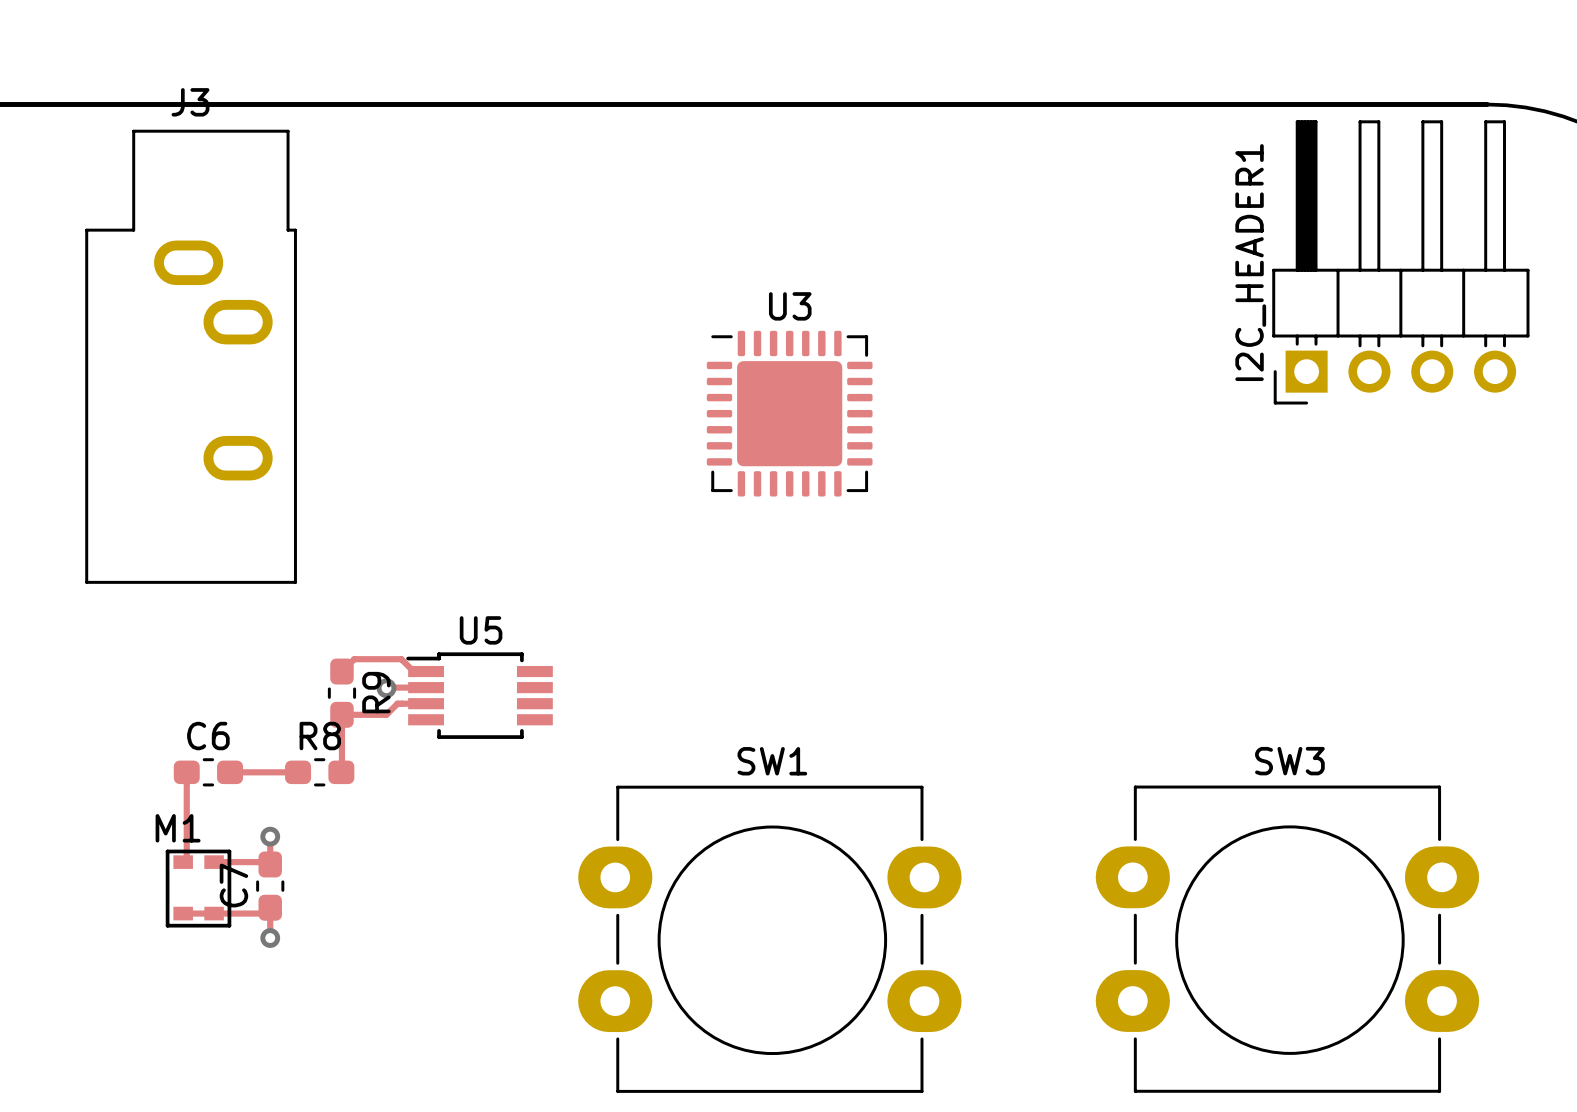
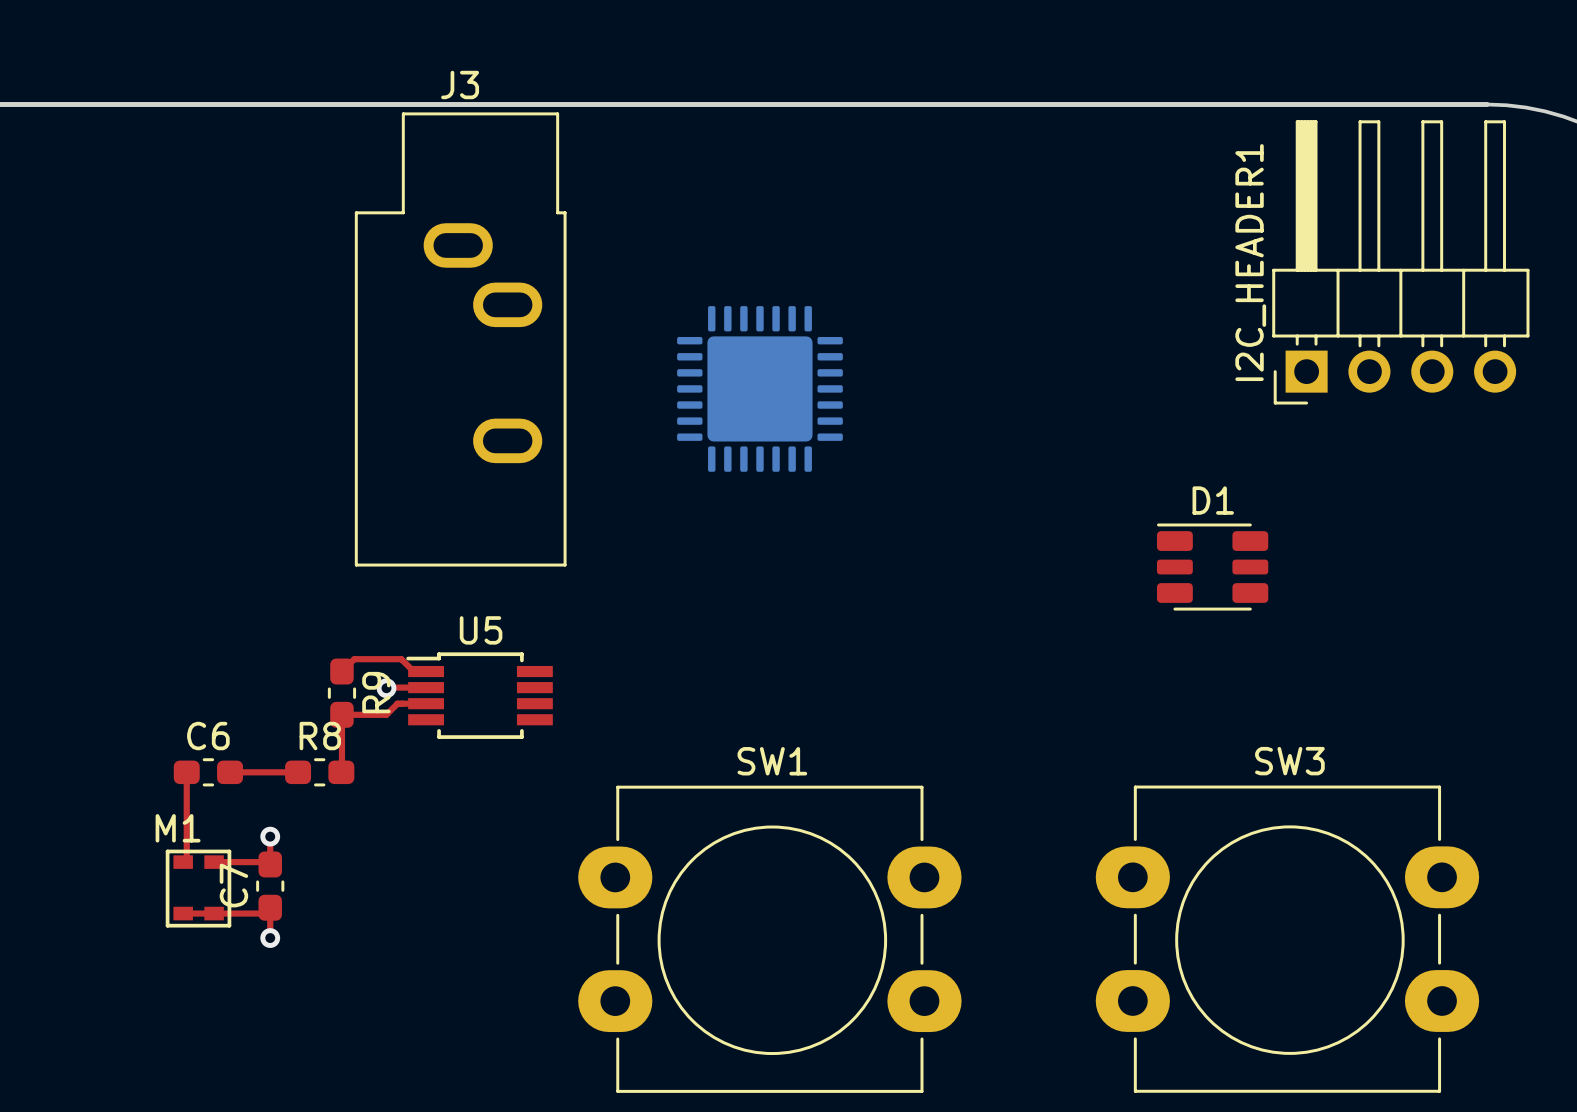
J3 position: (191, 356) -> (460, 339)
U3 side: top (789, 413) -> bottom (759, 388)
D1: none -> (1212, 567)

